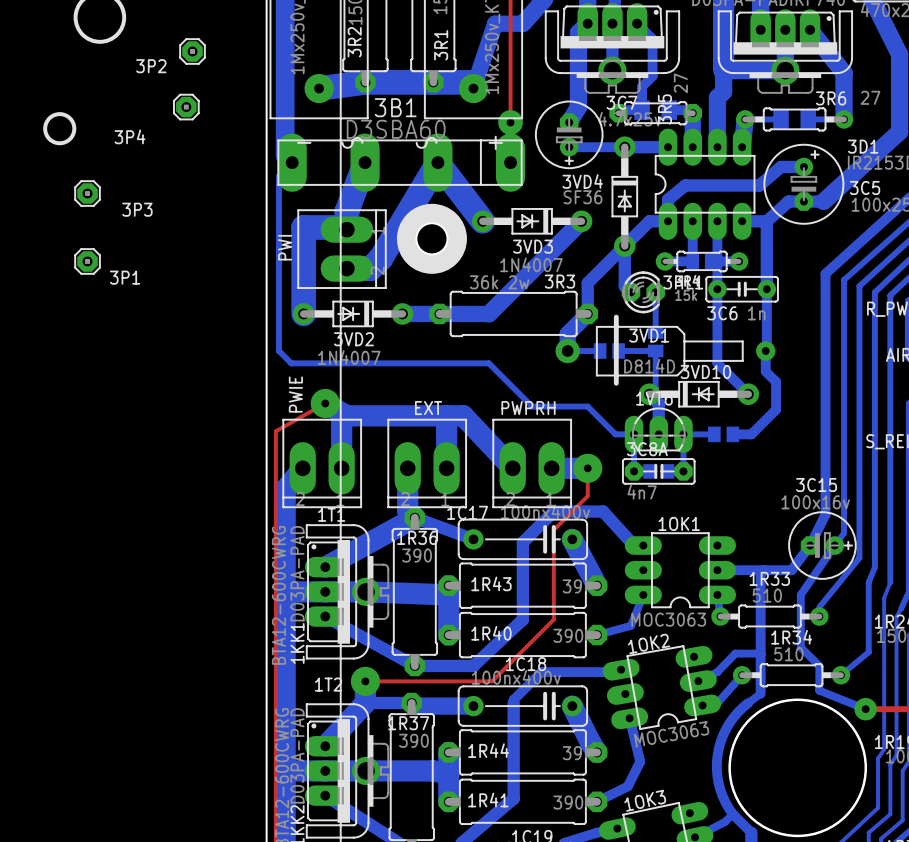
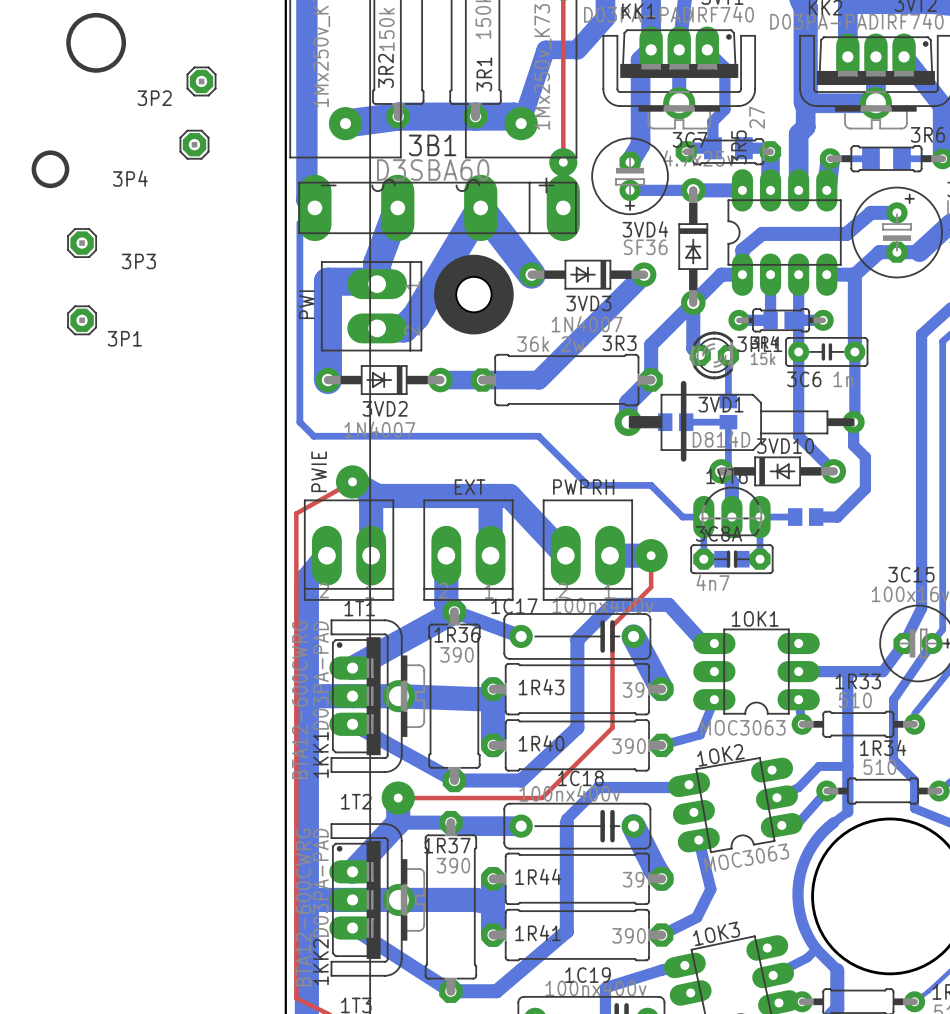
3VD1 footprint: [555, 314, 776, 386] -> [614, 380, 865, 462]

